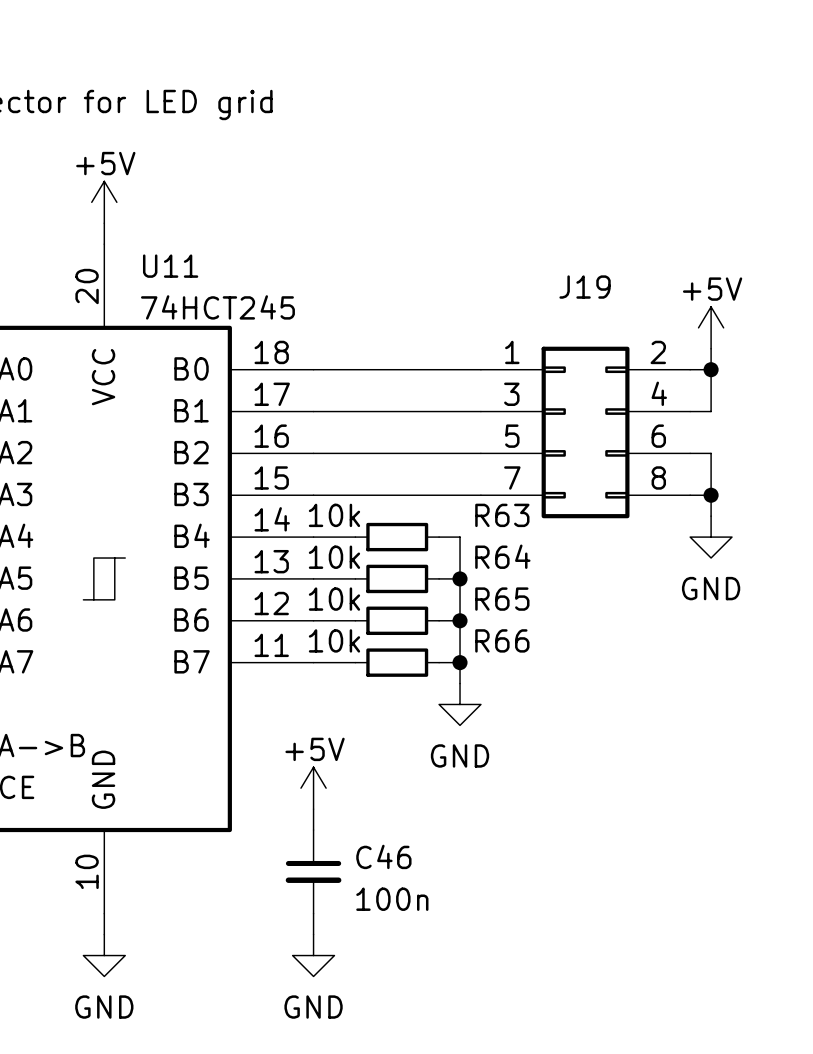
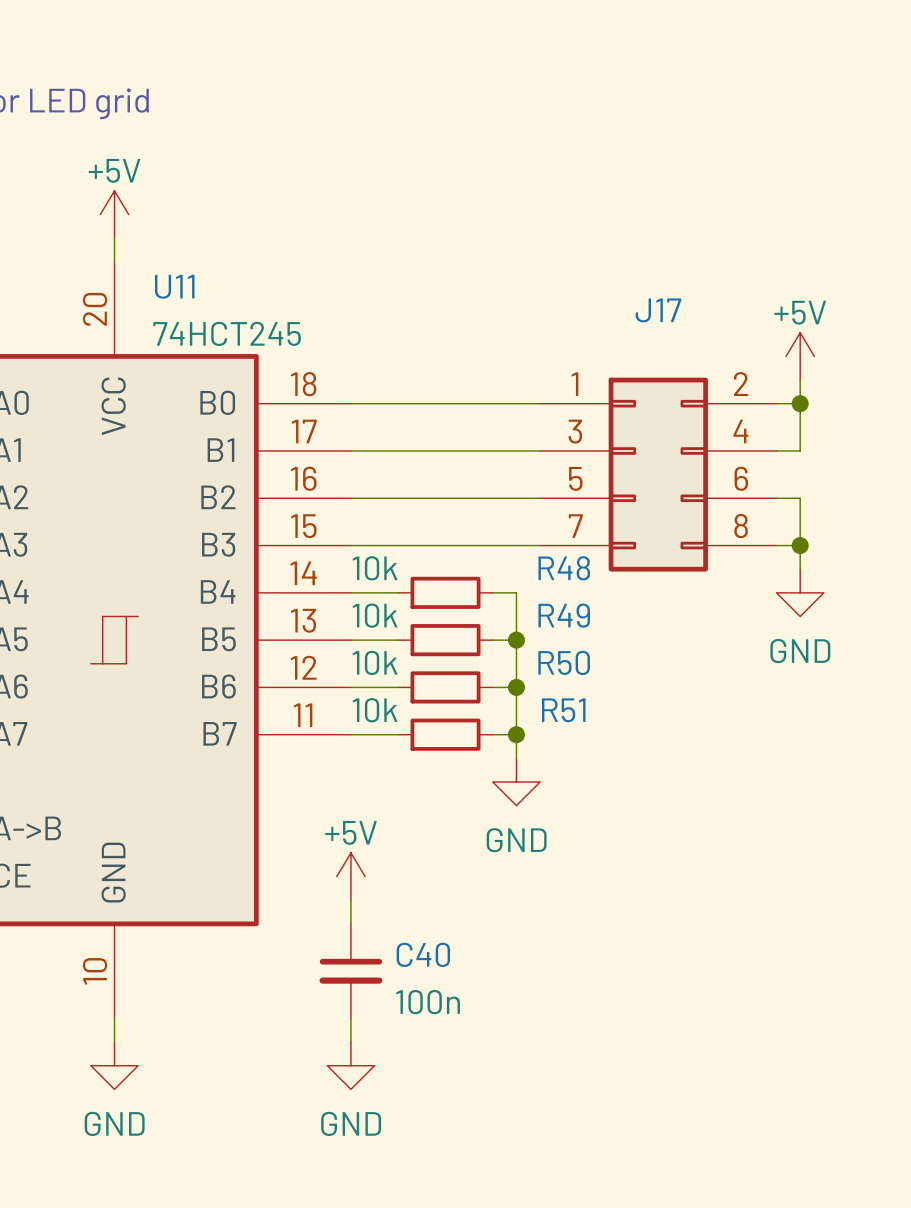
J19 name: J19 (585, 287) -> J17 (658, 310)
R63 name: R63 (502, 515) -> R48 (564, 568)
R64 name: R64 (502, 556) -> R49 (564, 615)
R65 name: R65 (502, 599) -> R50 (564, 662)
R66 name: R66 (502, 640) -> R51 (563, 710)
C46 name: C46 (383, 856) -> C40 (423, 954)

